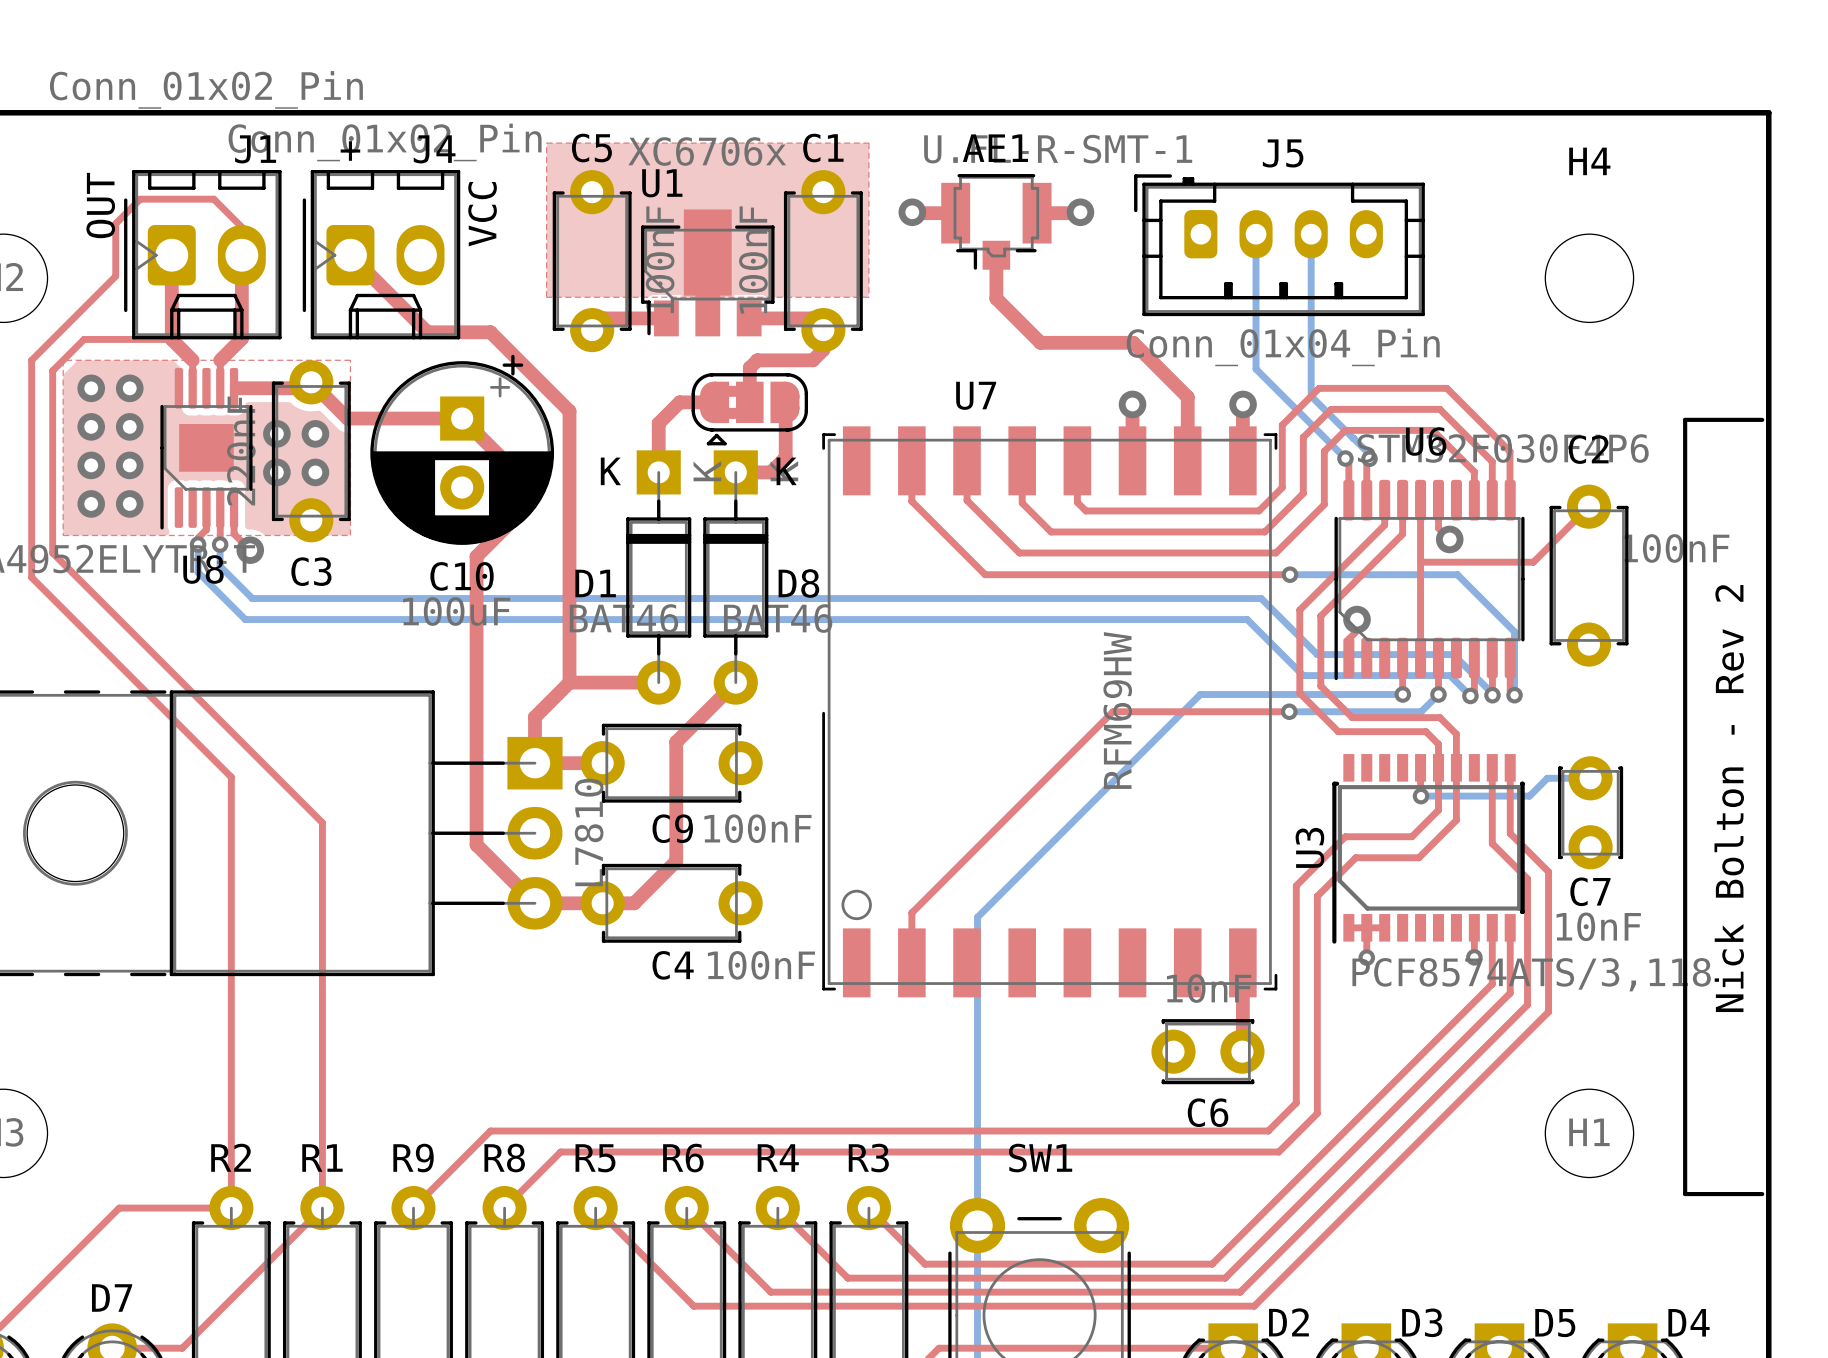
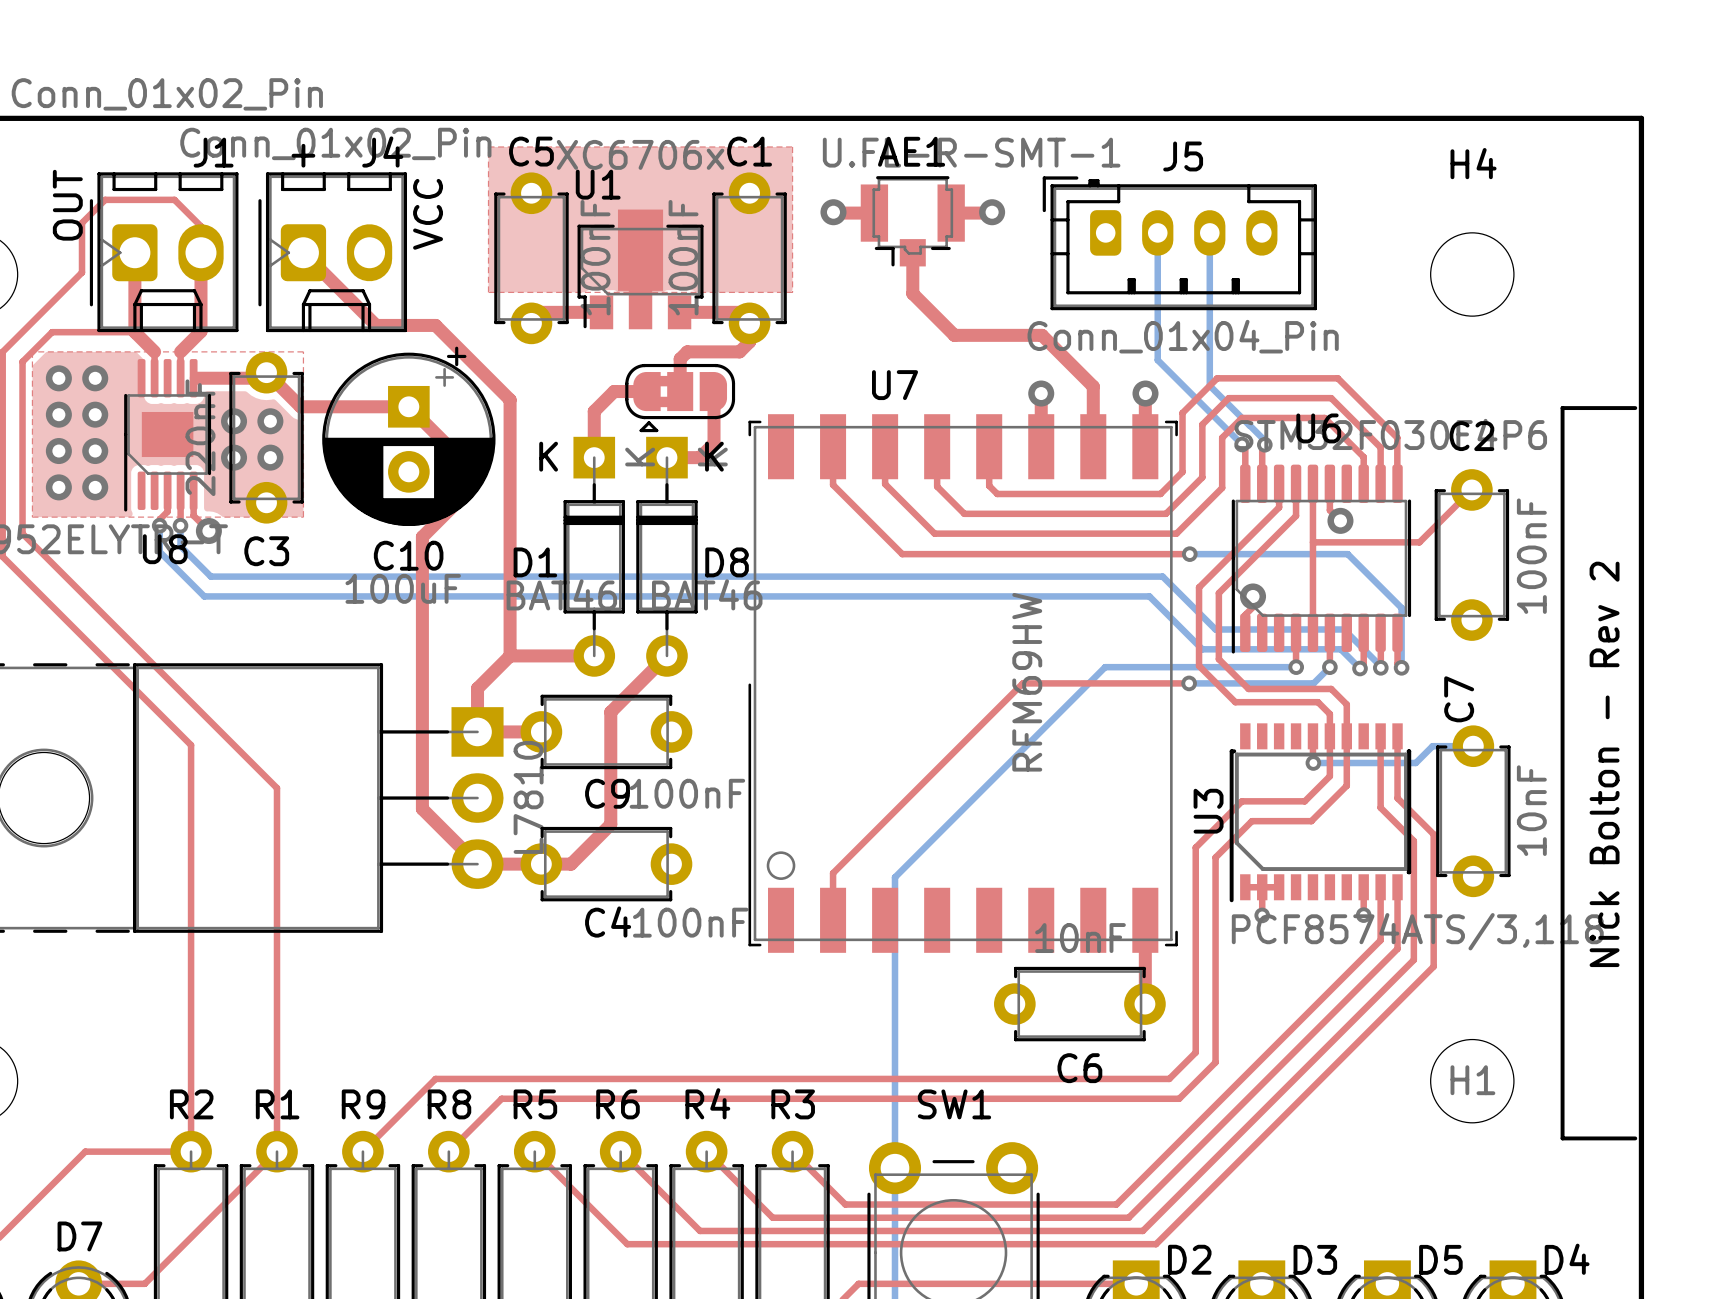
C2 value rotation: 0° (1675, 548) -> 90° counterclockwise (1531, 556)
C7 footprint: [1558, 756, 1624, 870] -> [1436, 725, 1511, 898]
C7 name position: C7 (1590, 891) -> C7 (1459, 699)
C7 value position: 10nF (1598, 926) -> 10nF (1531, 810)
C6 footprint: [1151, 1019, 1265, 1085] -> [994, 966, 1166, 1042]

